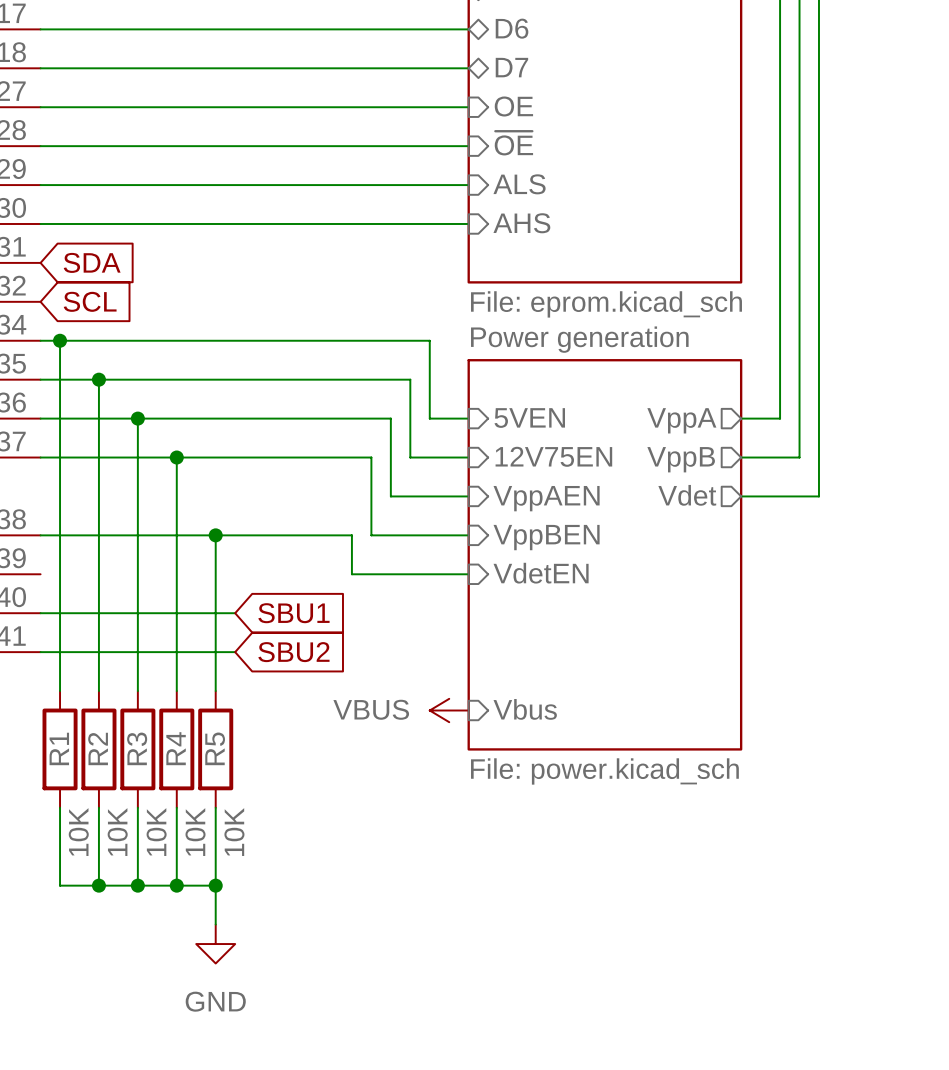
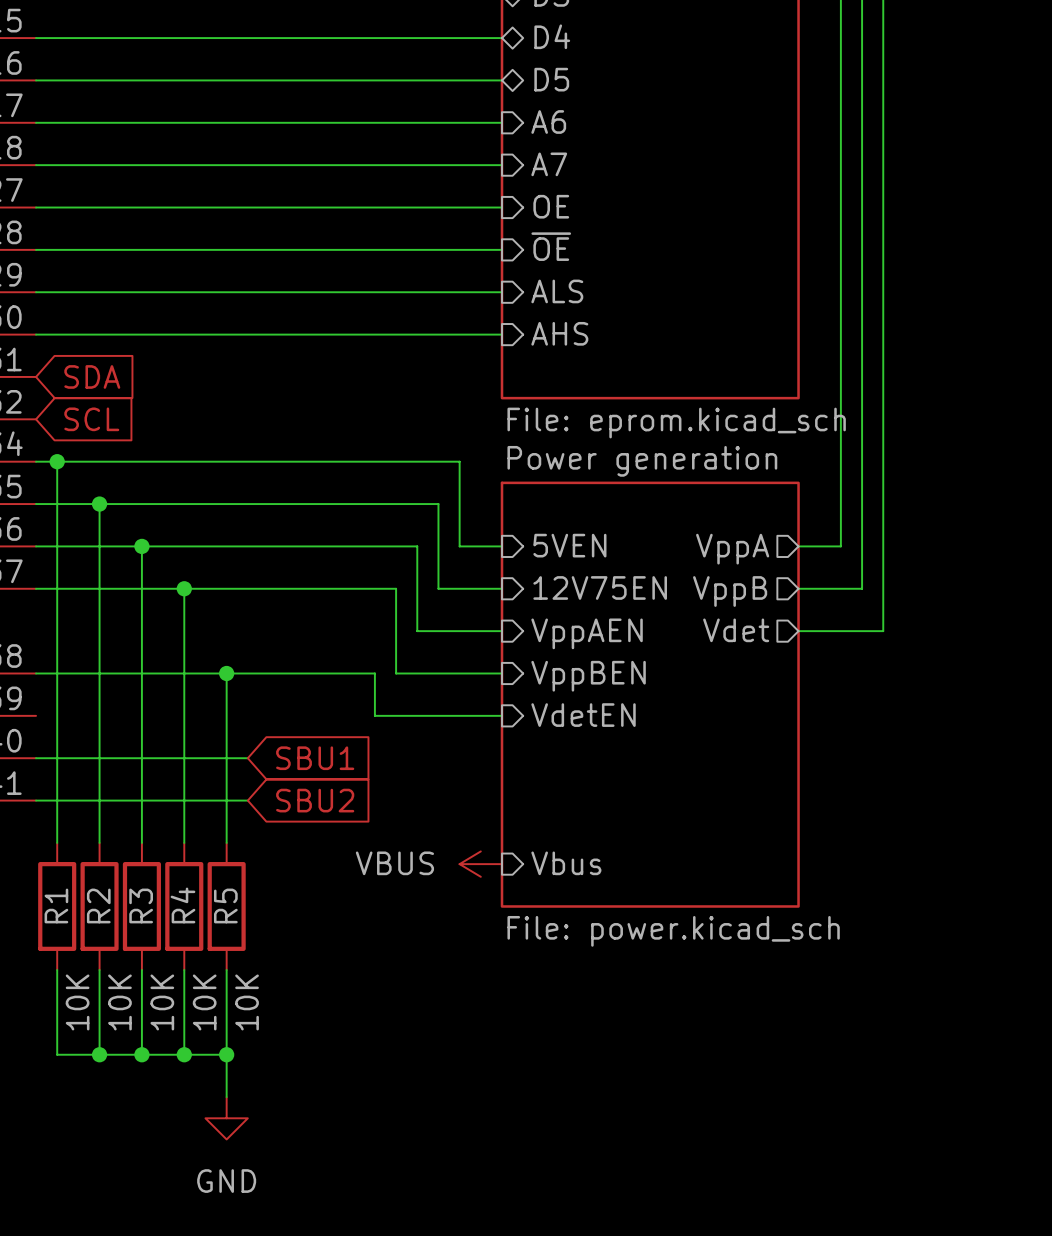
sheet pin shape: bidirectional (512, 28) -> input (548, 122)
sheet pin: D6 (512, 28) -> A6 (548, 122)
sheet pin shape: bidirectional (511, 67) -> input (549, 164)
sheet pin: D7 (511, 67) -> A7 (549, 164)

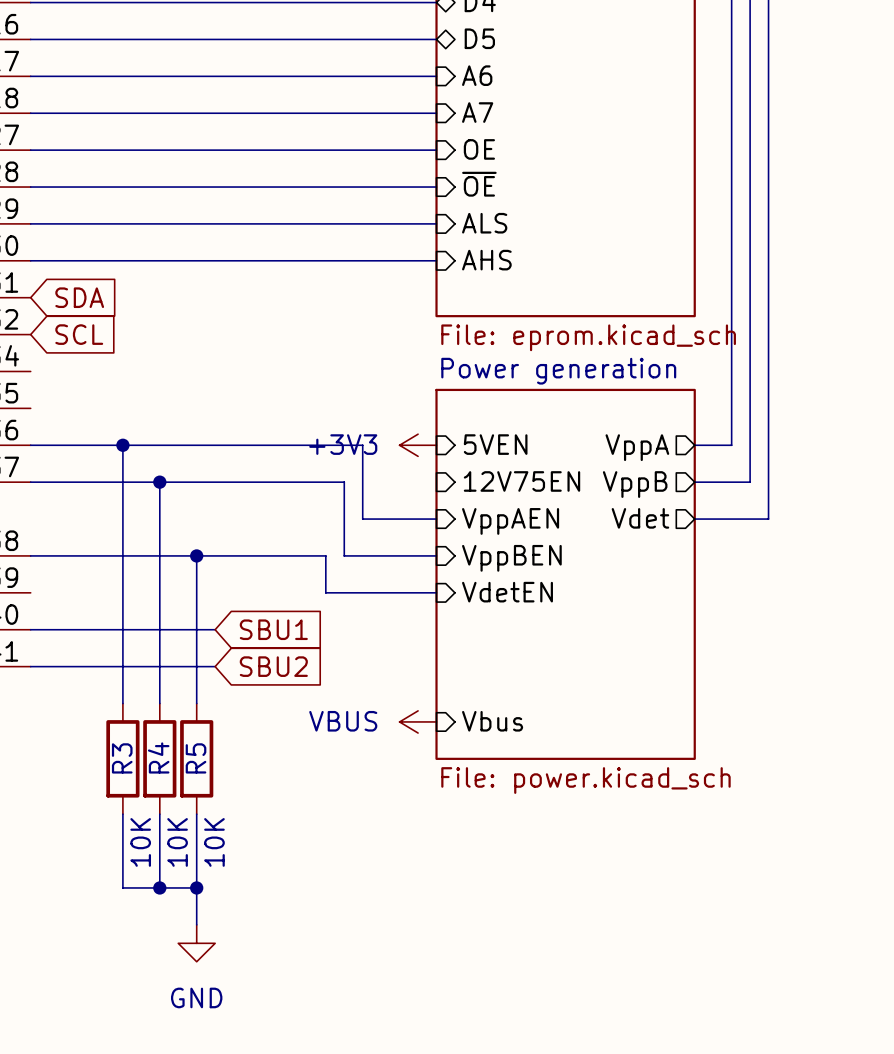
wire: (36, 461) (459, 461) (459, 546) (502, 546) -> none
wire: (57, 461) (57, 842) -> none
junction: (57, 461) -> none
wire: (36, 504) (438, 504) (438, 588) (502, 588) -> none
wire: (99, 504) (99, 842) -> none
junction: (99, 504) -> none
power symbol: none -> +3V3 (418, 445)
R1: 10K (57, 906) -> none
R2: 10K (99, 906) -> none
wire: (57, 970) (57, 1054) (141, 1054) -> none
wire: (99, 970) (99, 1054) -> none
junction: (99, 1054) -> none
junction: (141, 1054) -> none

